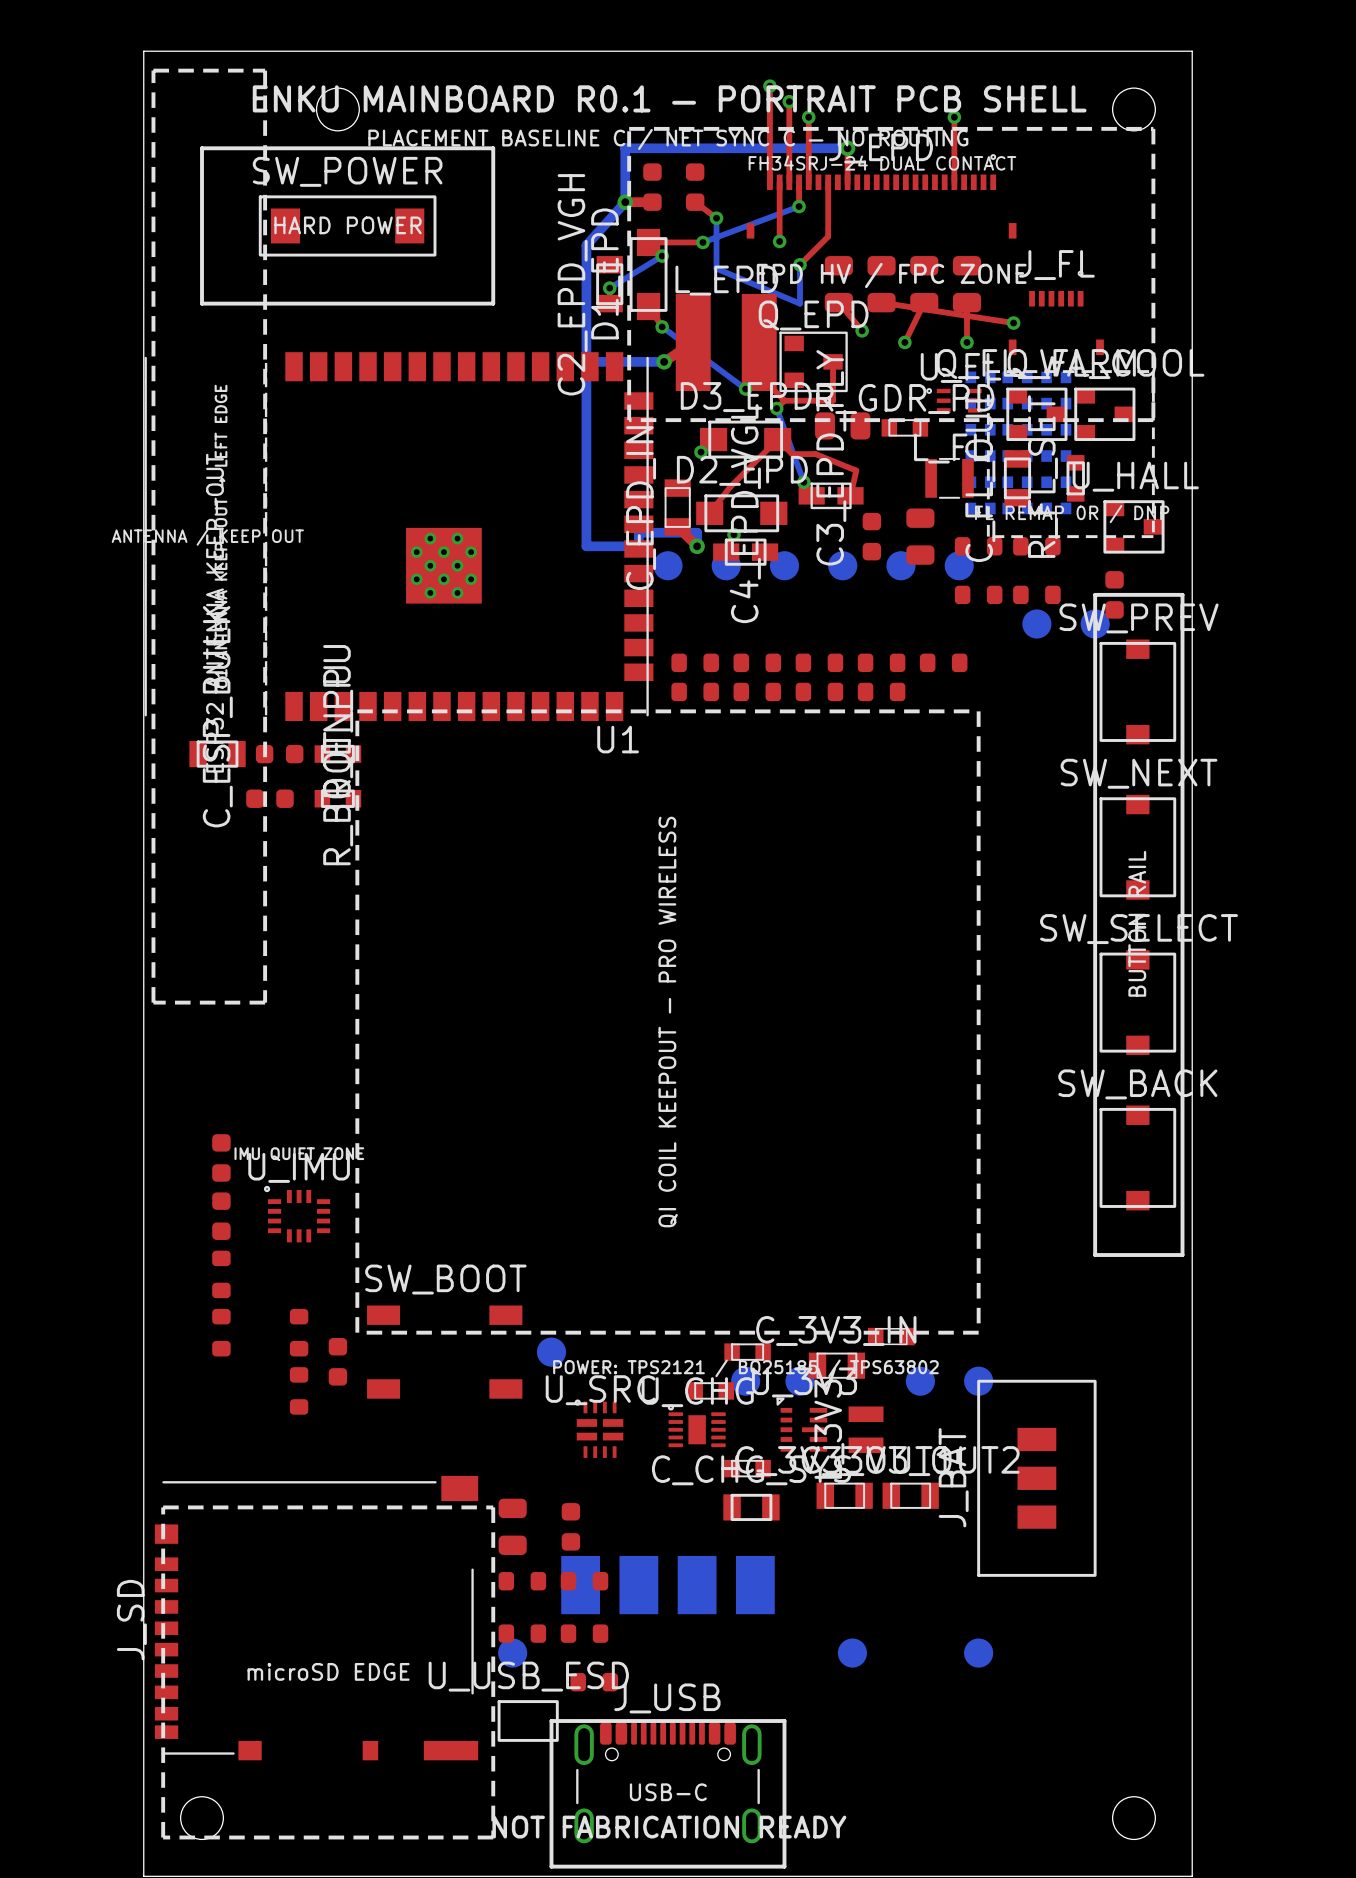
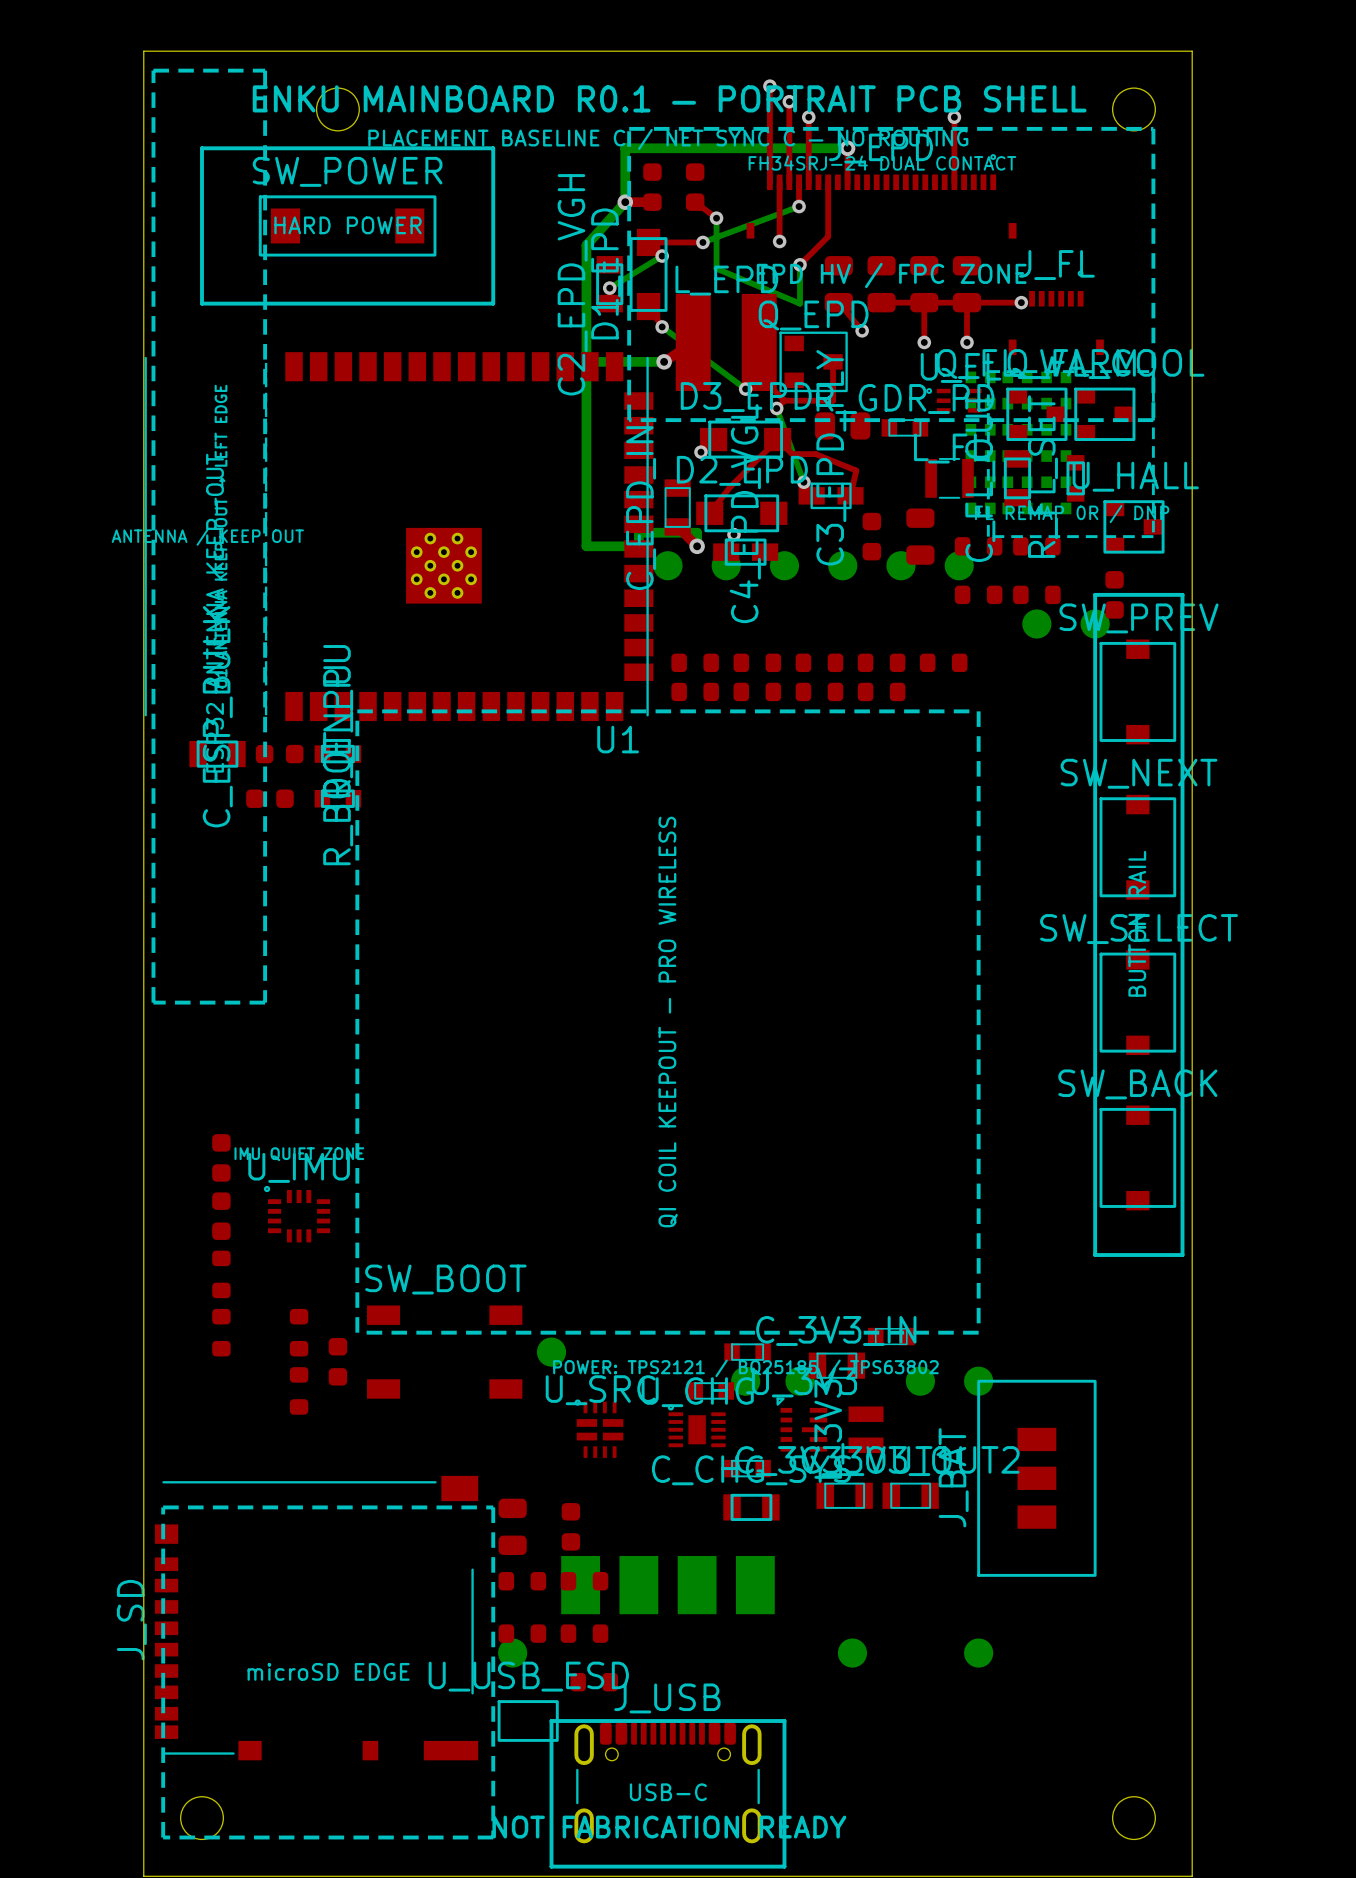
top track: (881, 302) (1013, 323) -> (881, 302) (1021, 302)
top track: (924, 302) (904, 342) -> (924, 302) (924, 342)
via position: (1013, 323) -> (1021, 302)
via position: (904, 342) -> (924, 342)

